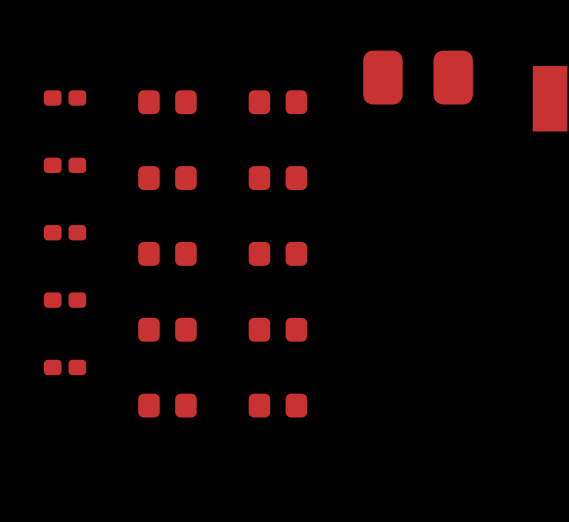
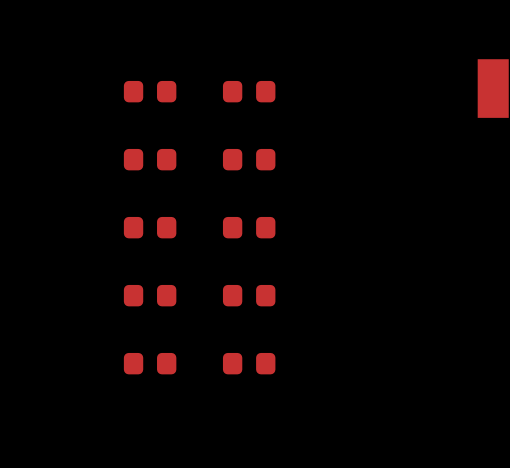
part: (418, 77) -> none
part: (65, 97) -> none
part: (65, 165) -> none
part: (65, 232) -> none
part: (65, 300) -> none
part: (65, 367) -> none

